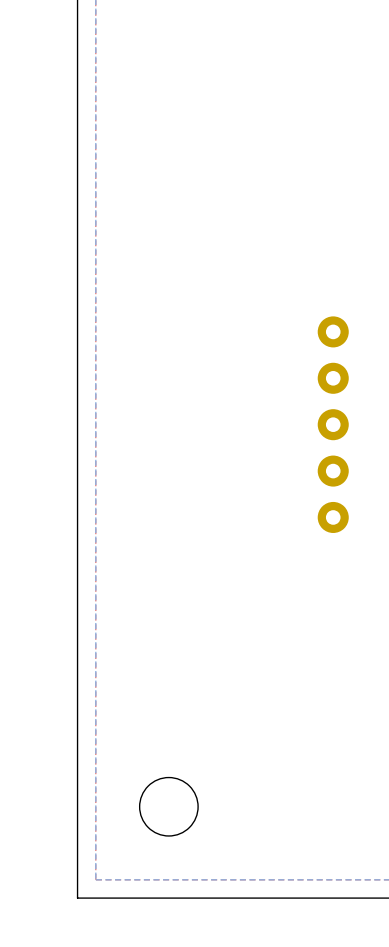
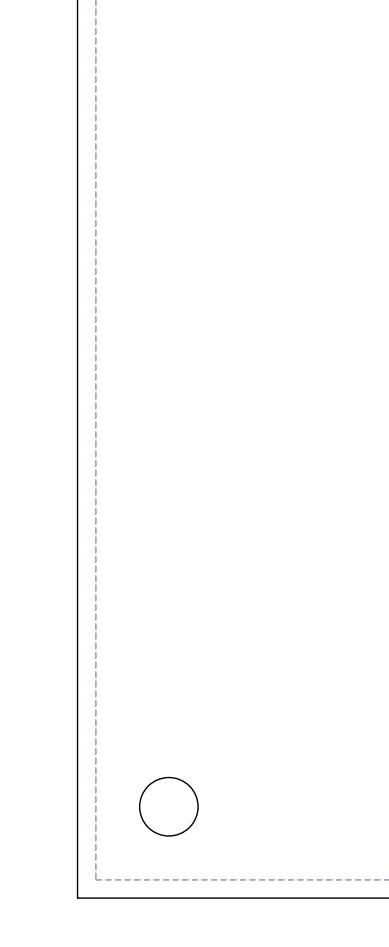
part: (333, 424) -> none

